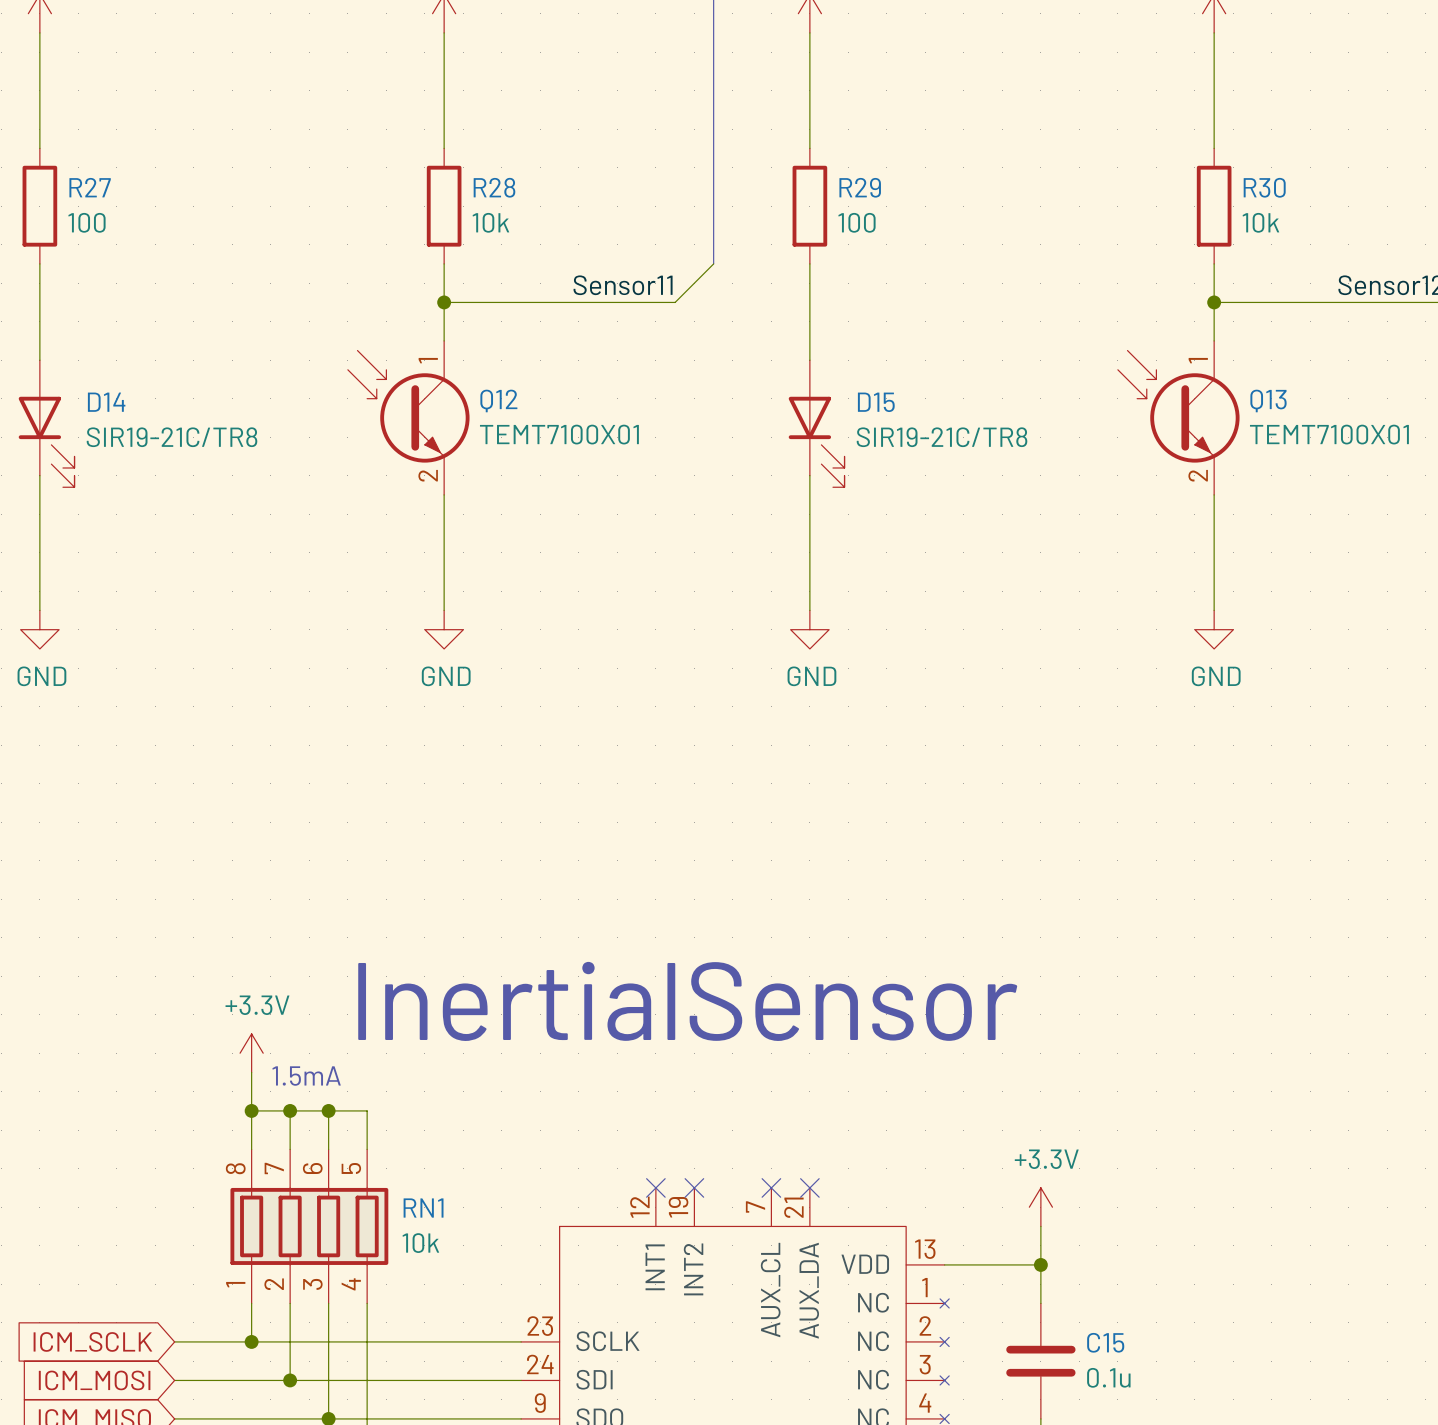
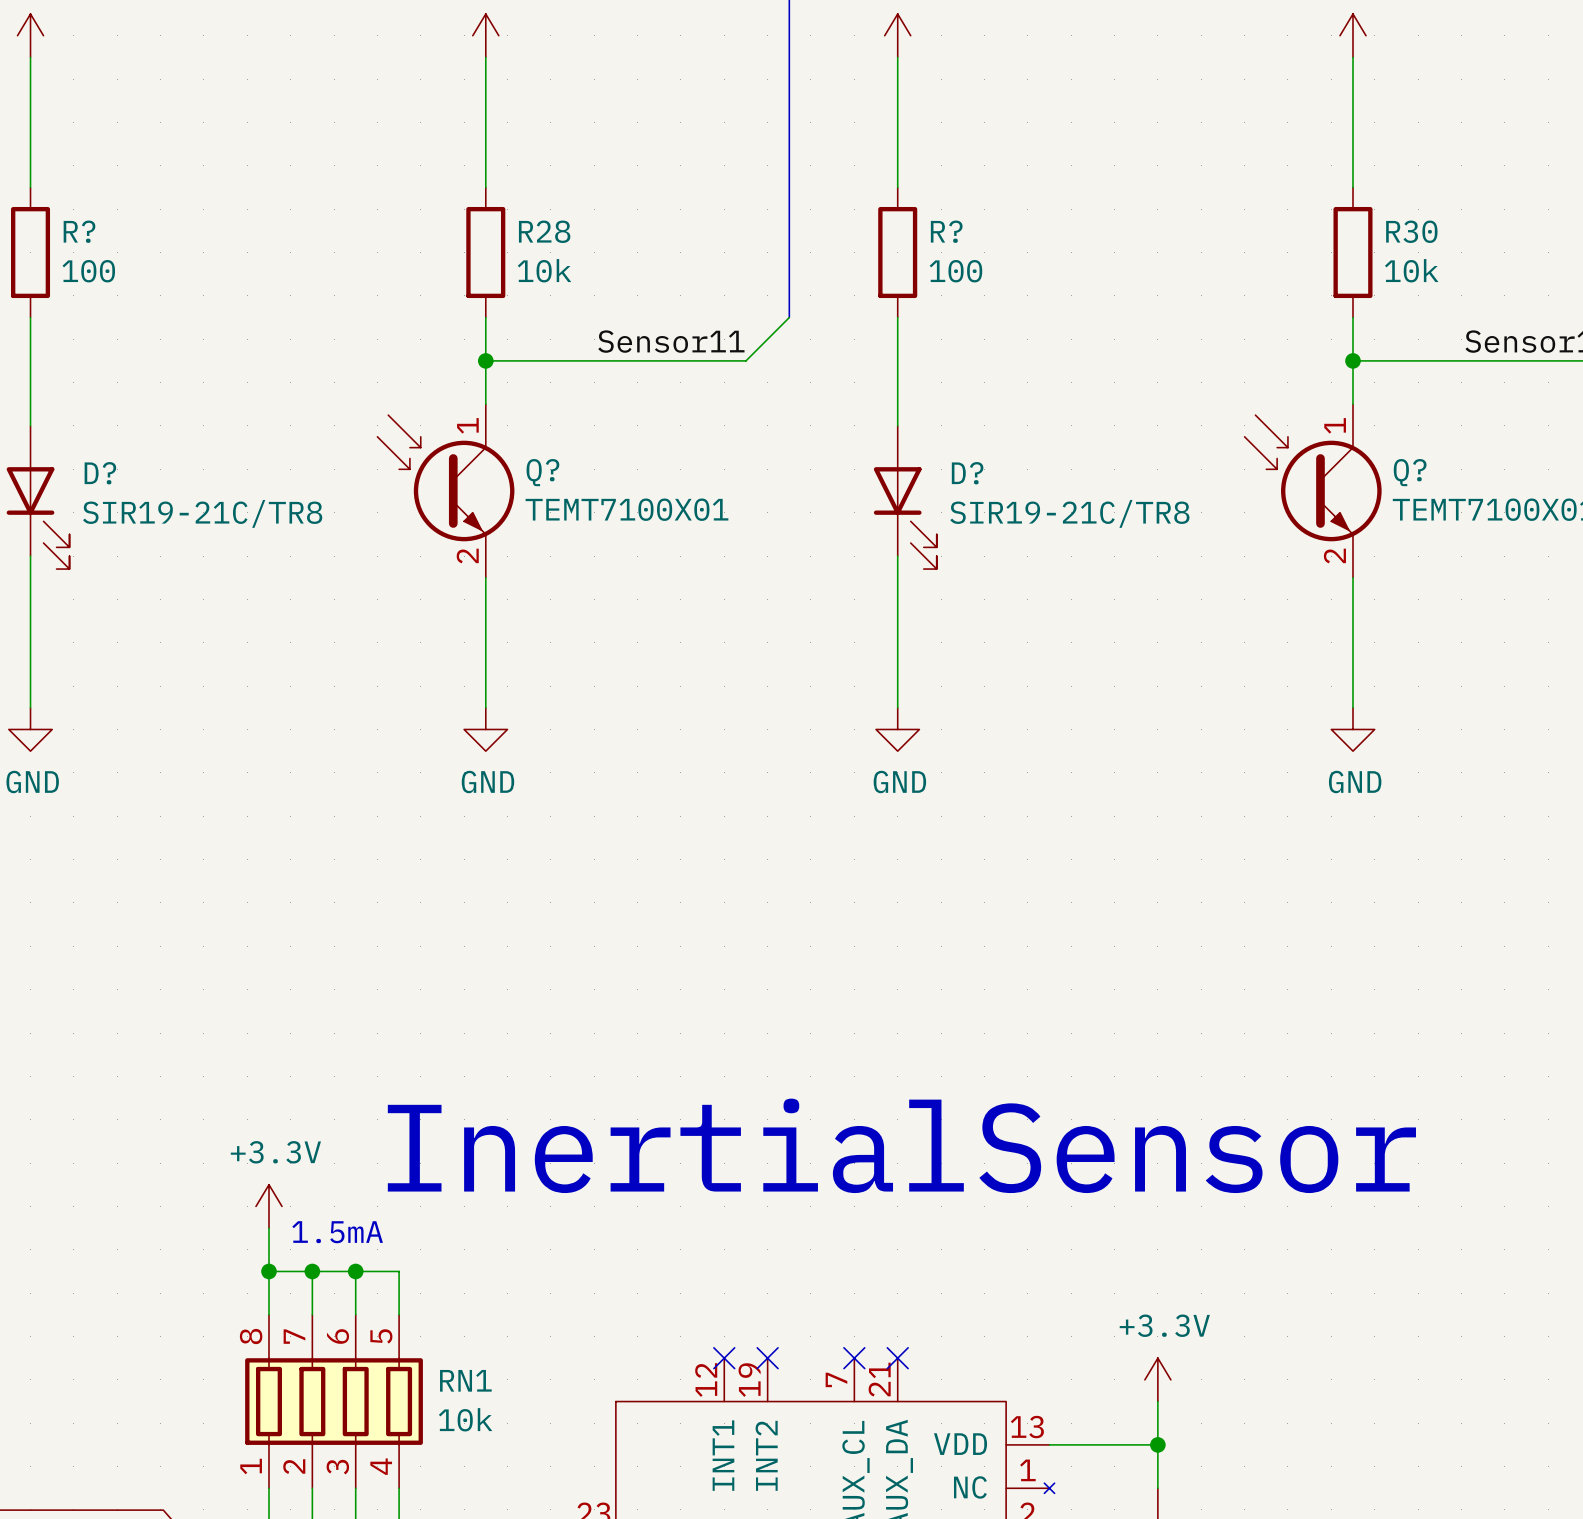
R27 name: R27 (90, 187) -> R? (79, 231)
R29 name: R29 (860, 187) -> R? (946, 231)
Q12 name: Q12 (498, 400) -> Q? (542, 472)
Q13 name: Q13 (1268, 400) -> Q? (1410, 472)
D14 name: D14 (106, 402) -> D? (100, 473)
D15 name: D15 (876, 402) -> D? (967, 473)

